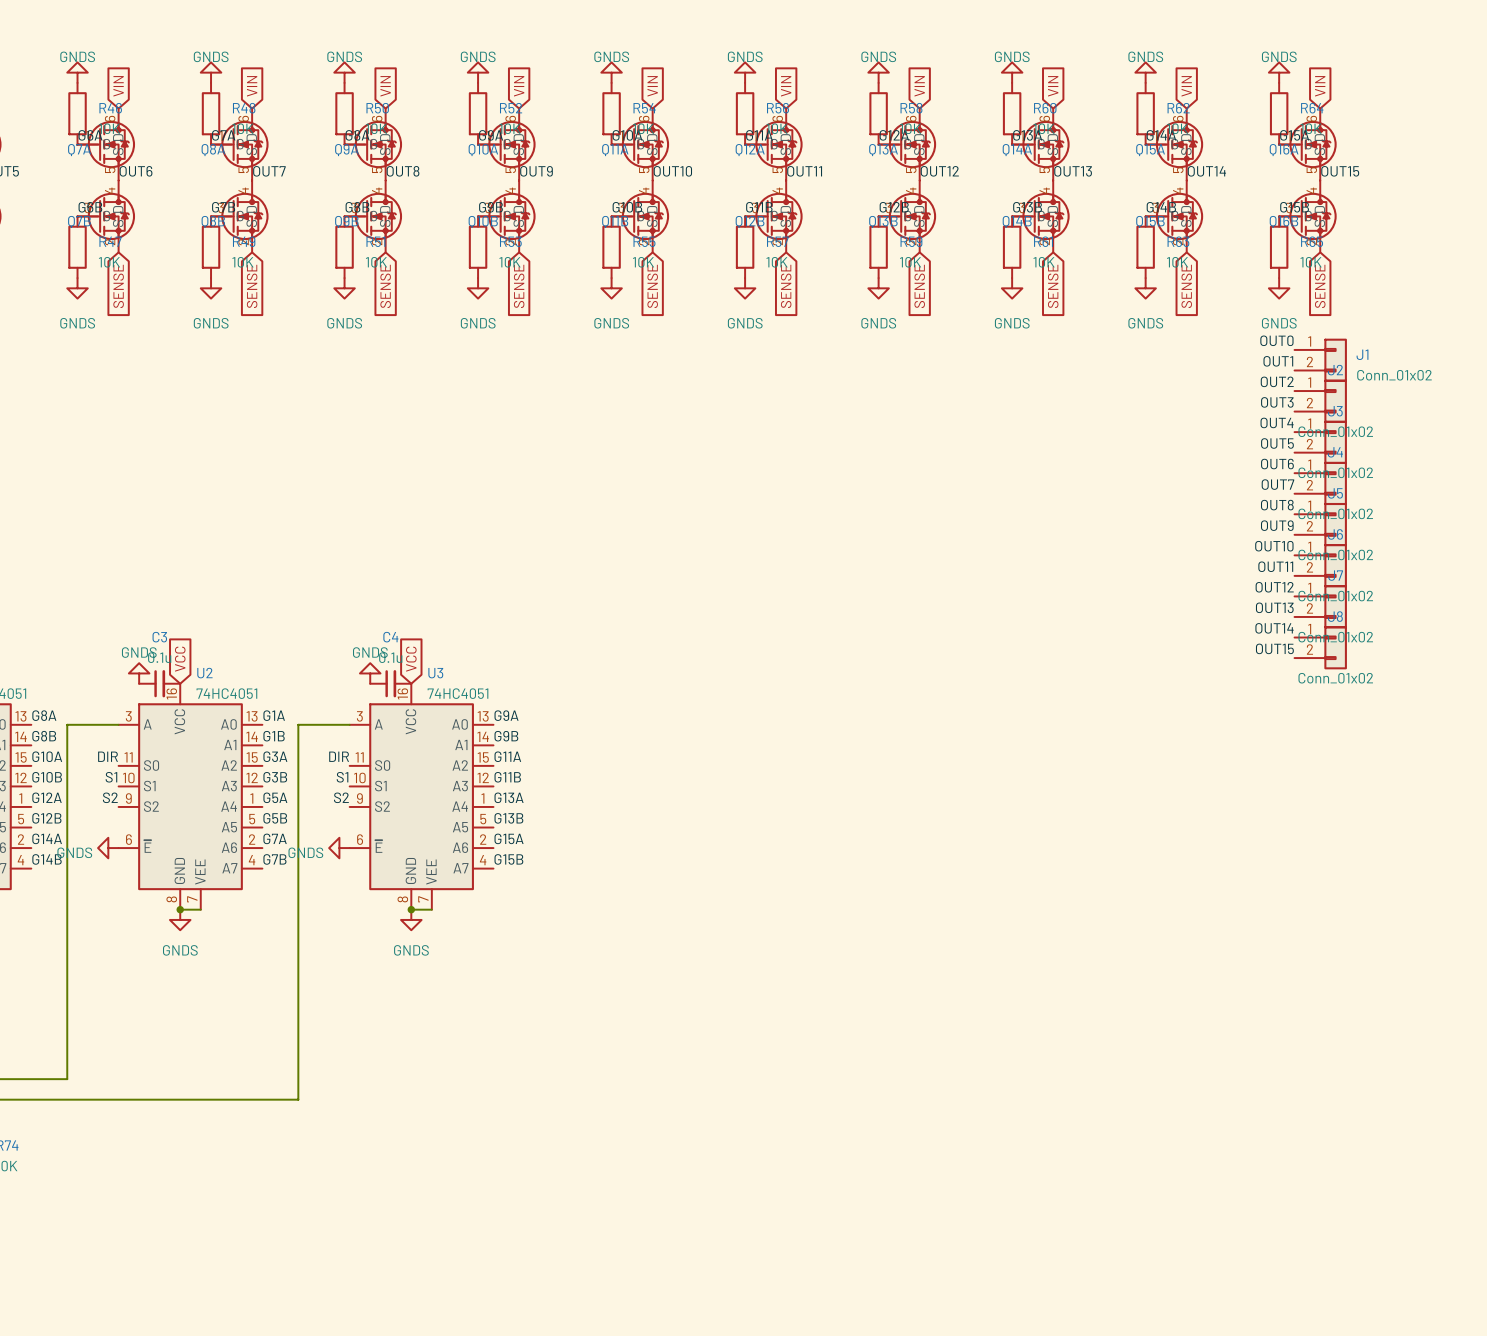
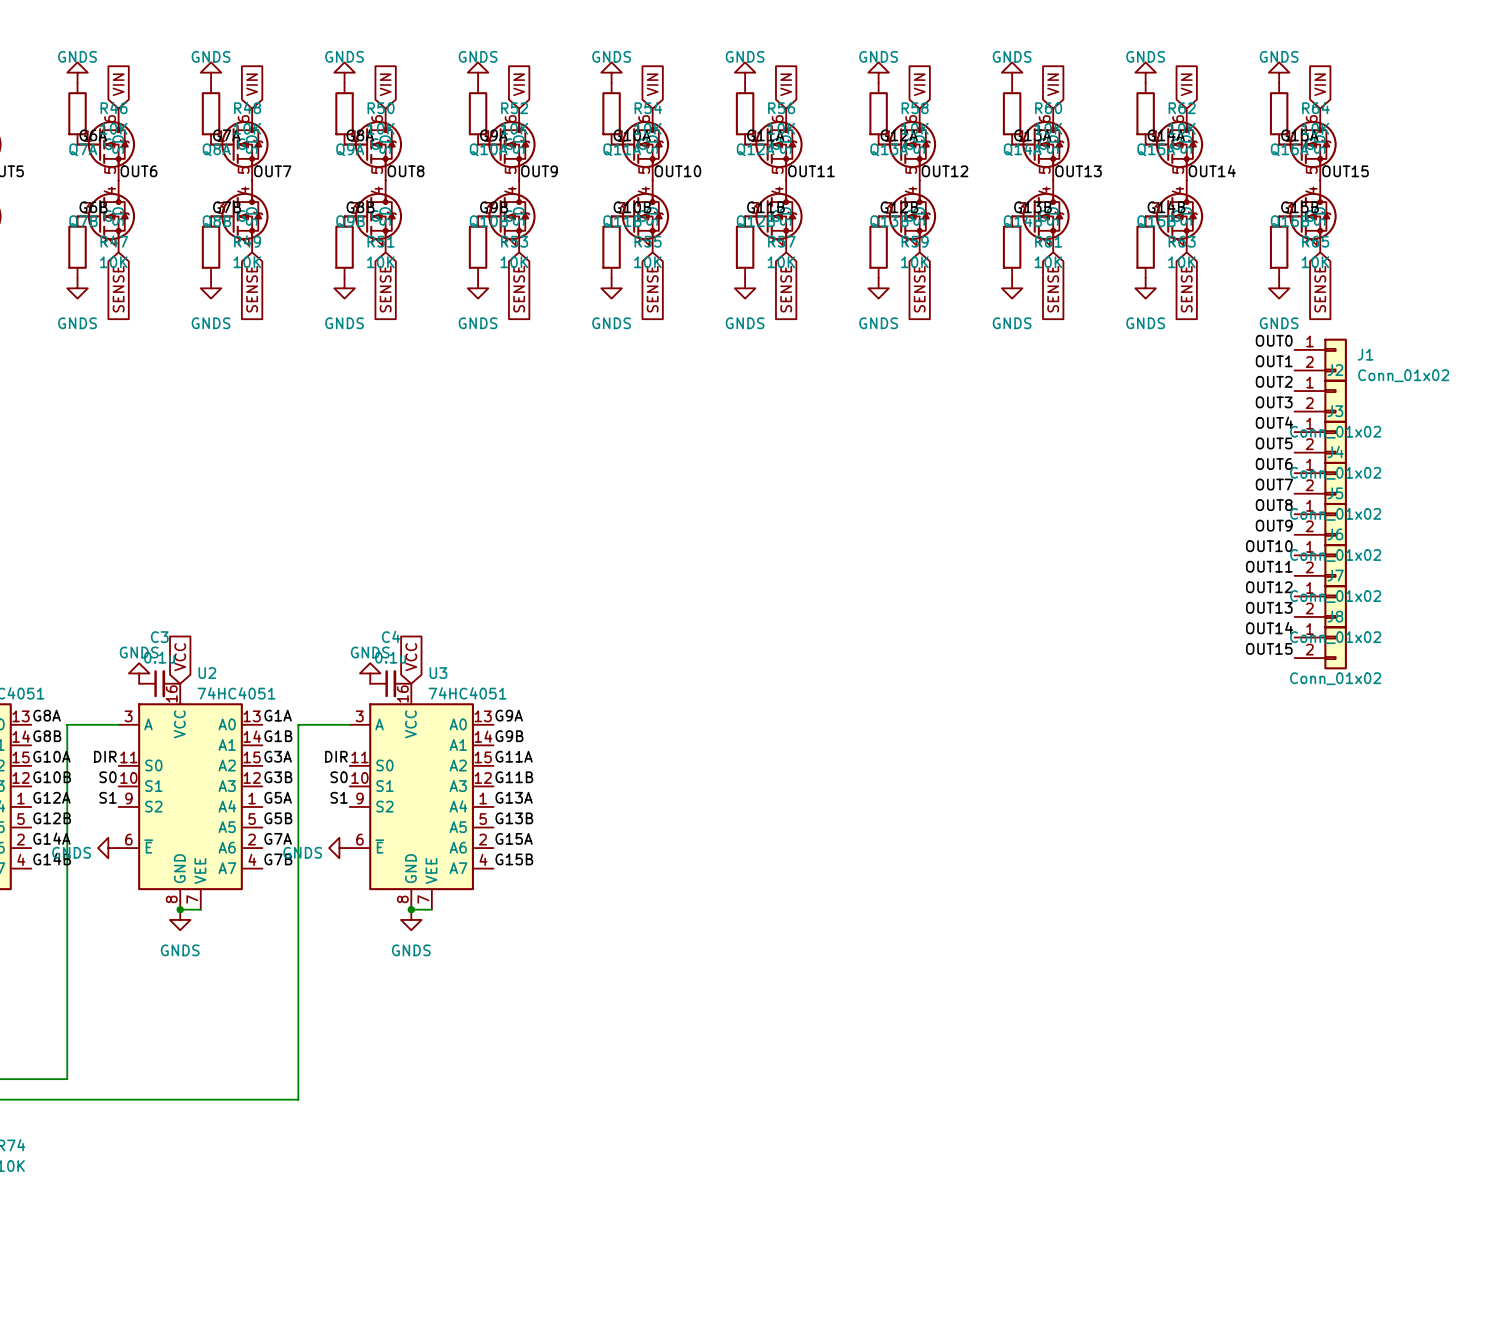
label: S1 (111, 777) -> S0 (108, 777)
label: S1 (342, 777) -> S0 (339, 777)
label: S2 (110, 797) -> S1 (108, 797)
label: S2 (341, 797) -> S1 (339, 797)

